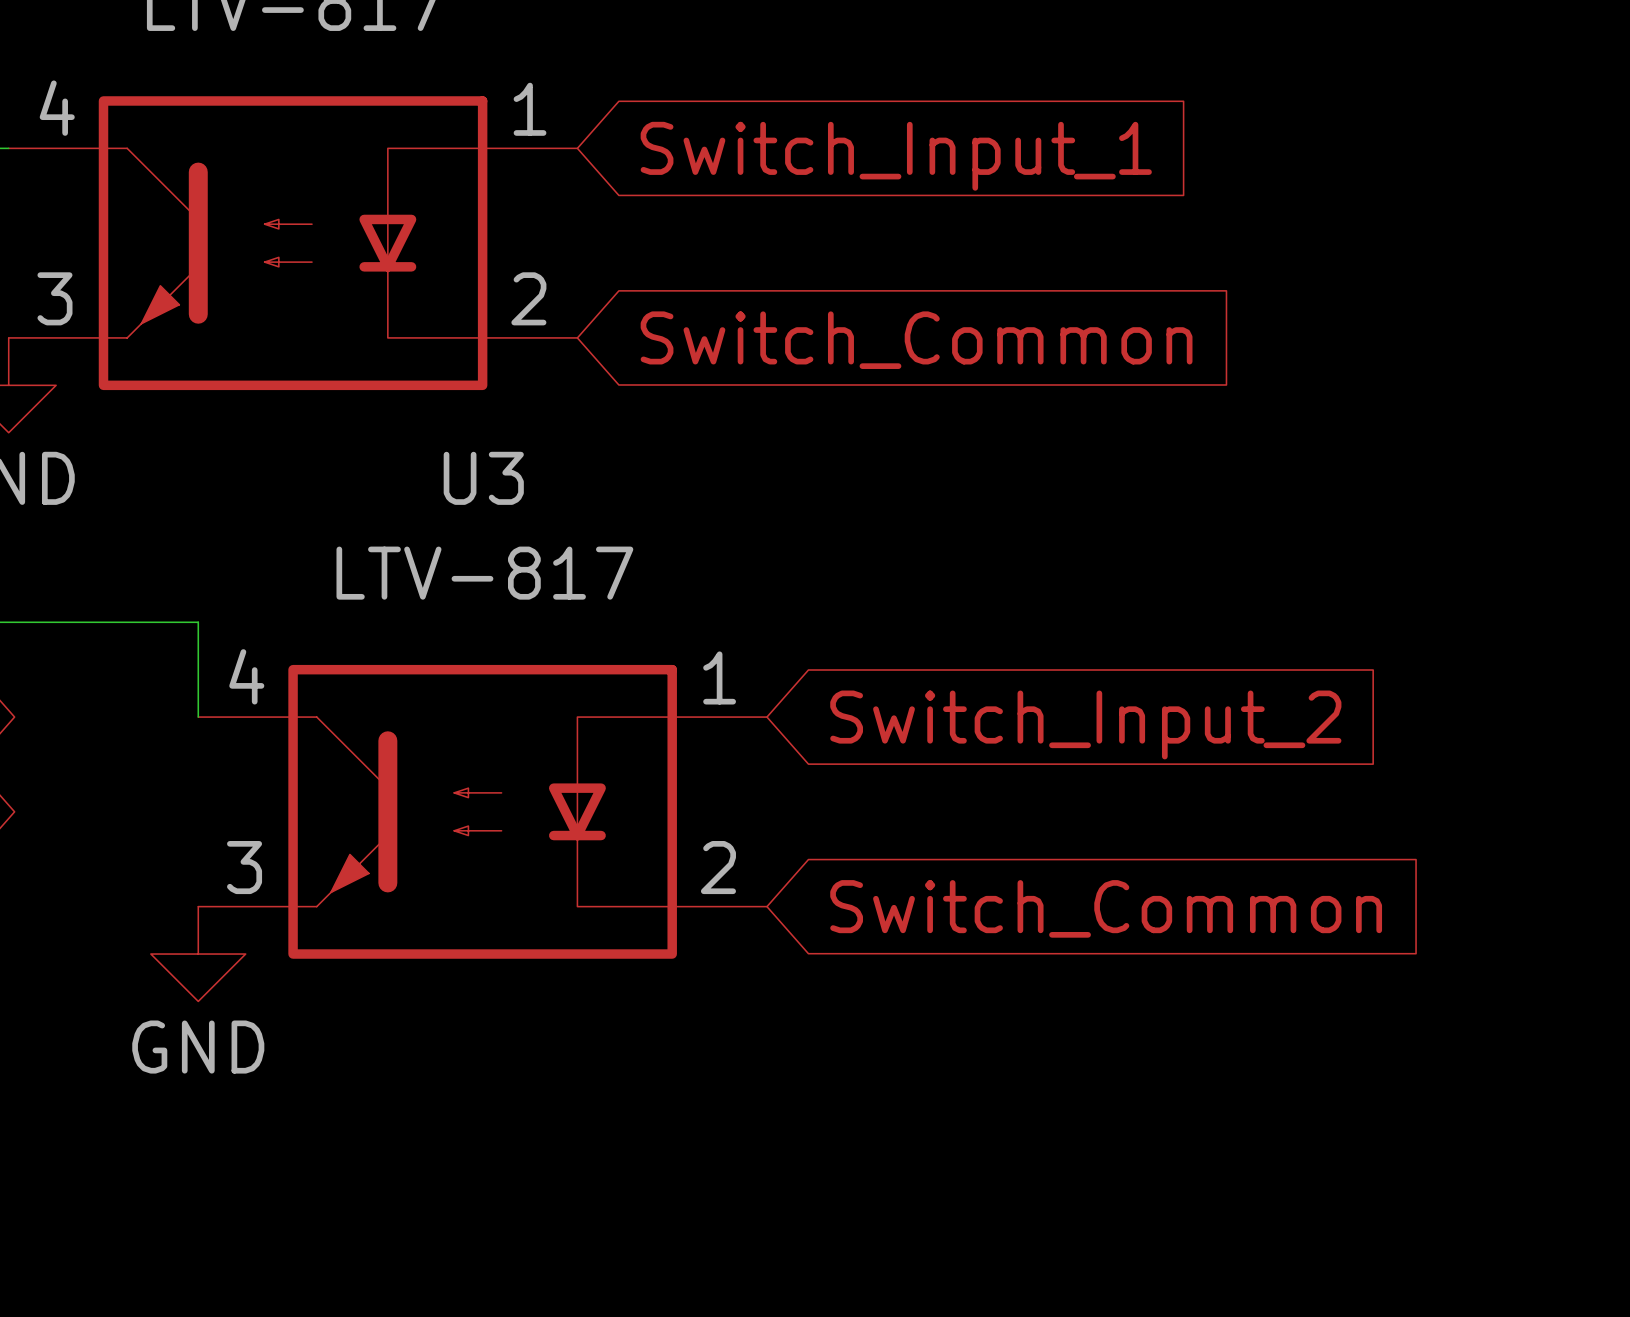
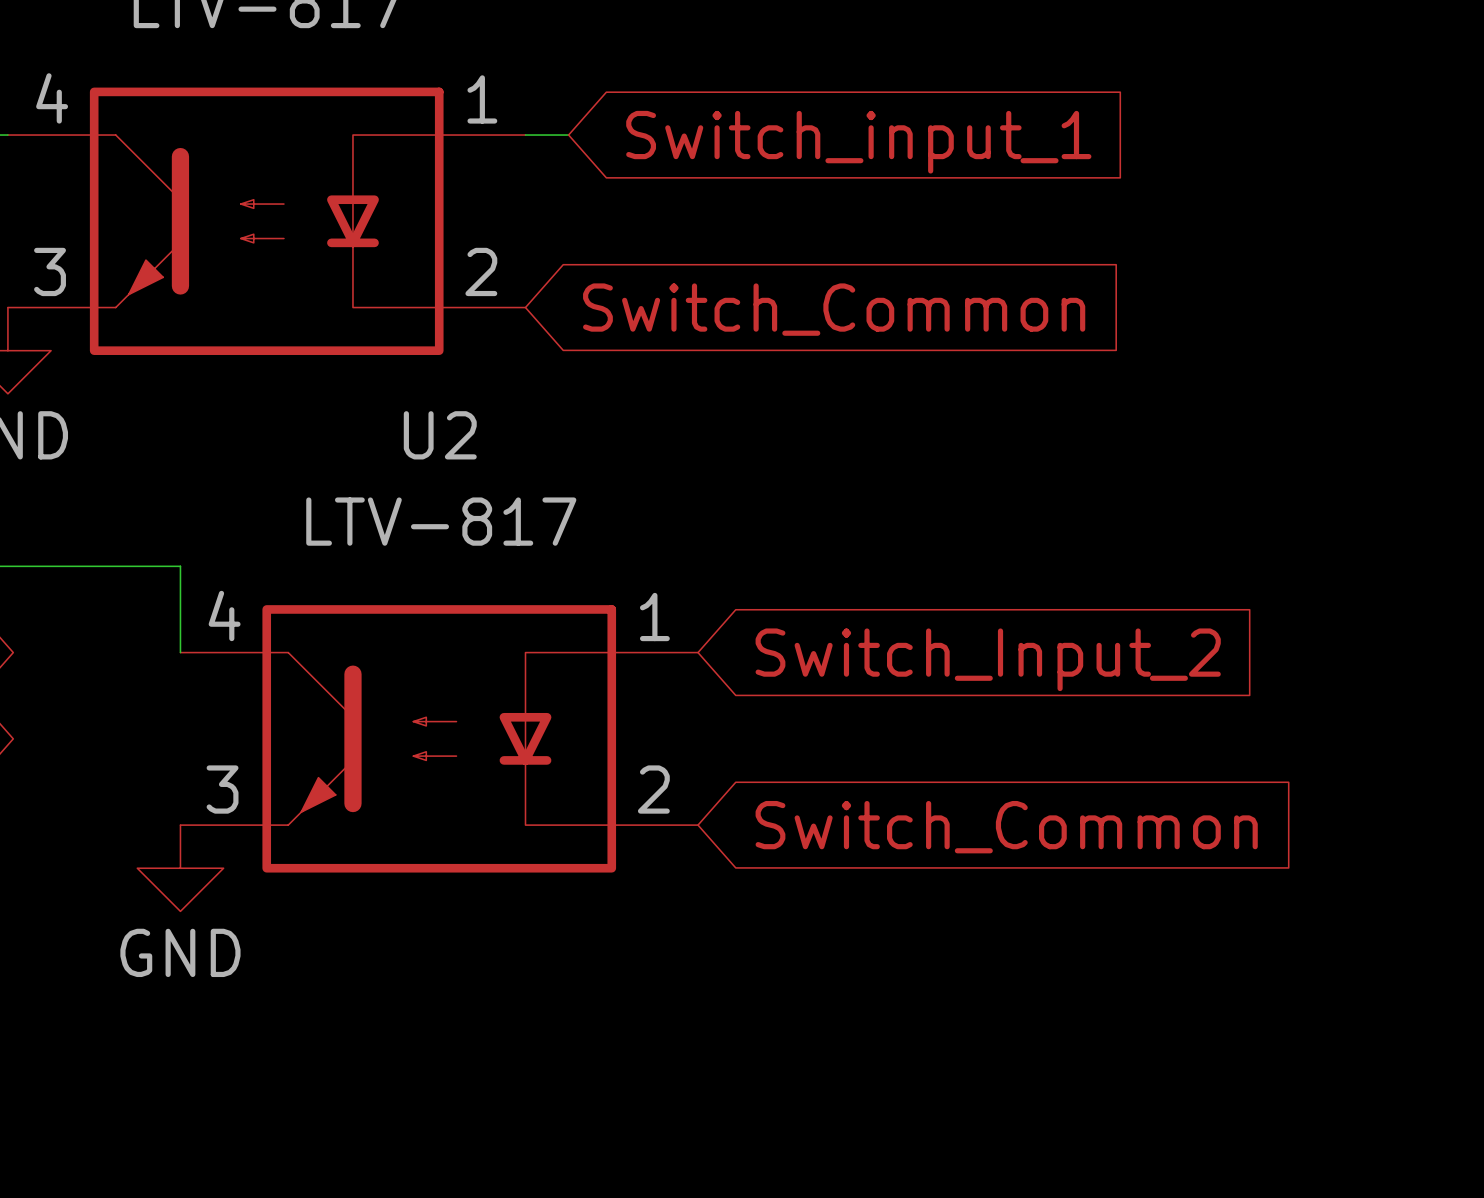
wire: none -> (525, 135) (568, 135)
global label: Switch_Input_1 (896, 156) -> Switch_input_1 (858, 142)
U3 name: U3 (483, 478) -> U2 (440, 435)

